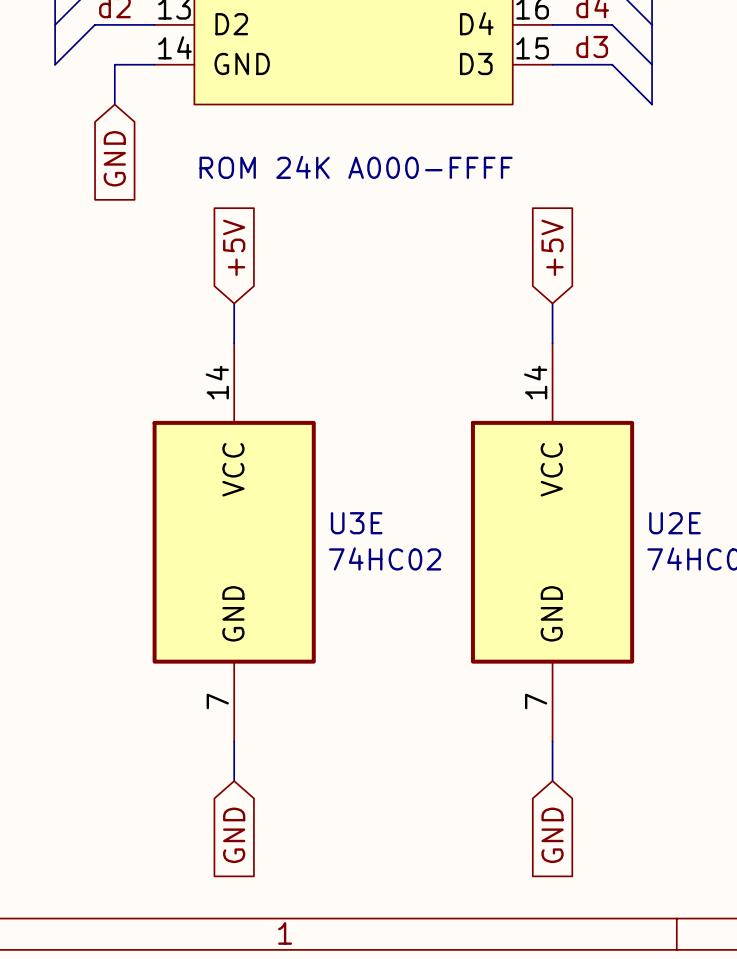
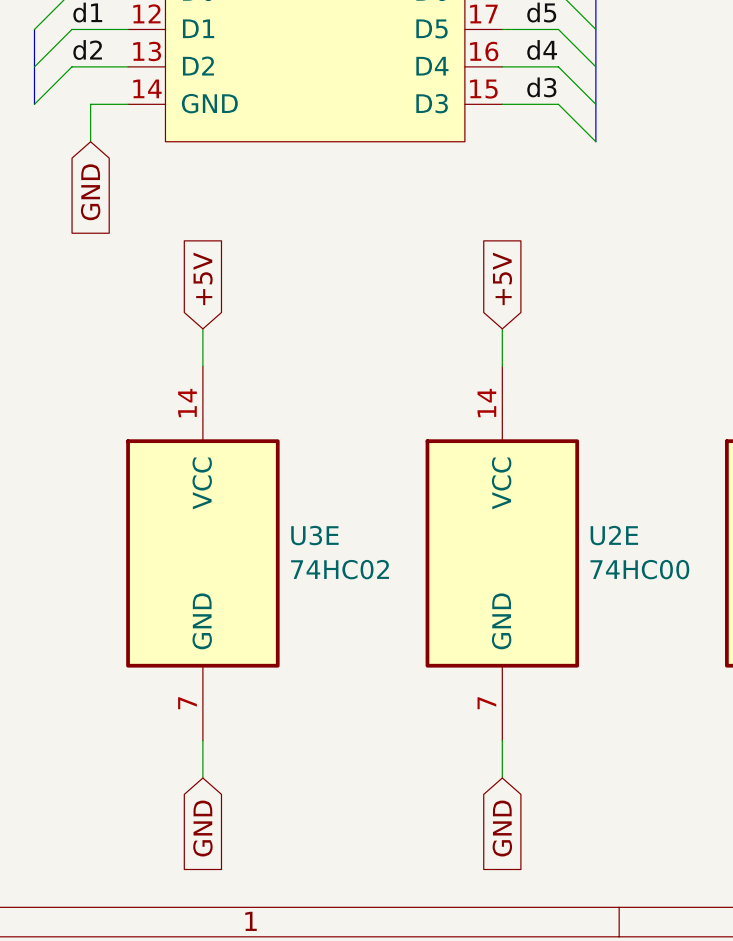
text: ROM 24K A000-FFFF (356, 167) -> none

